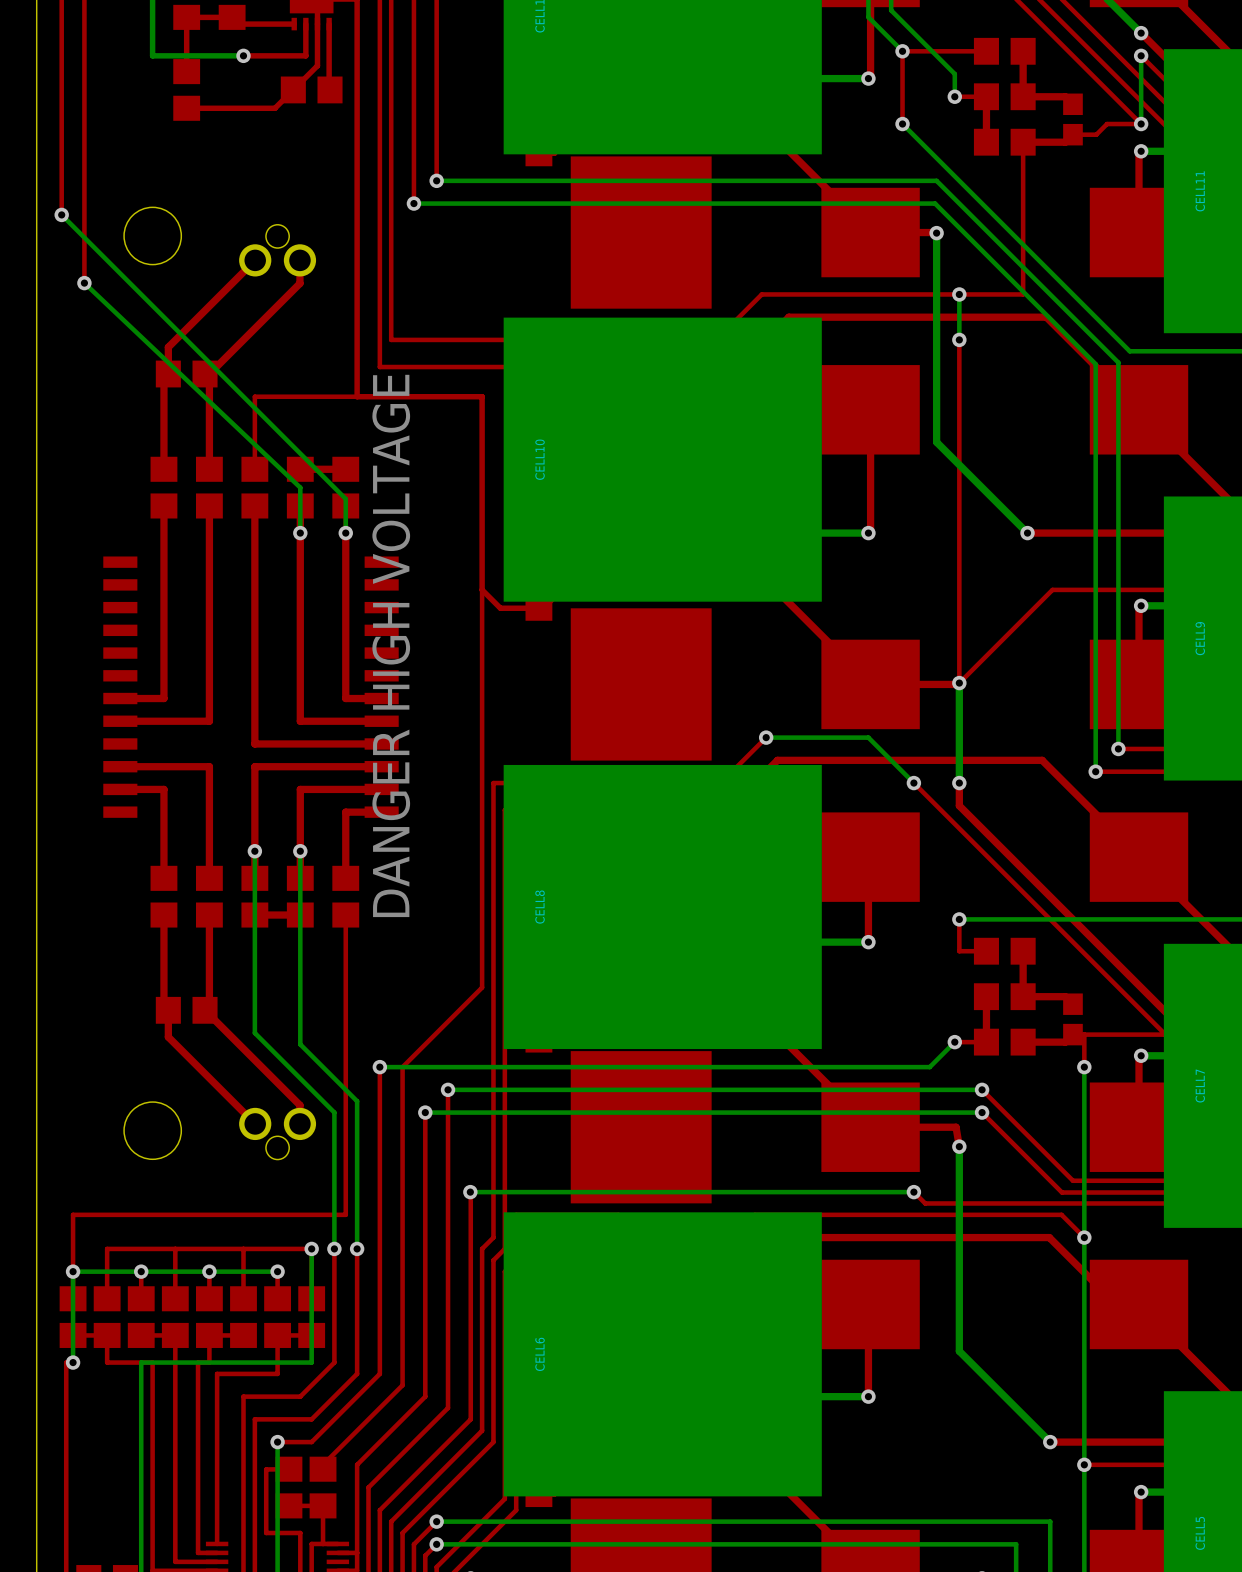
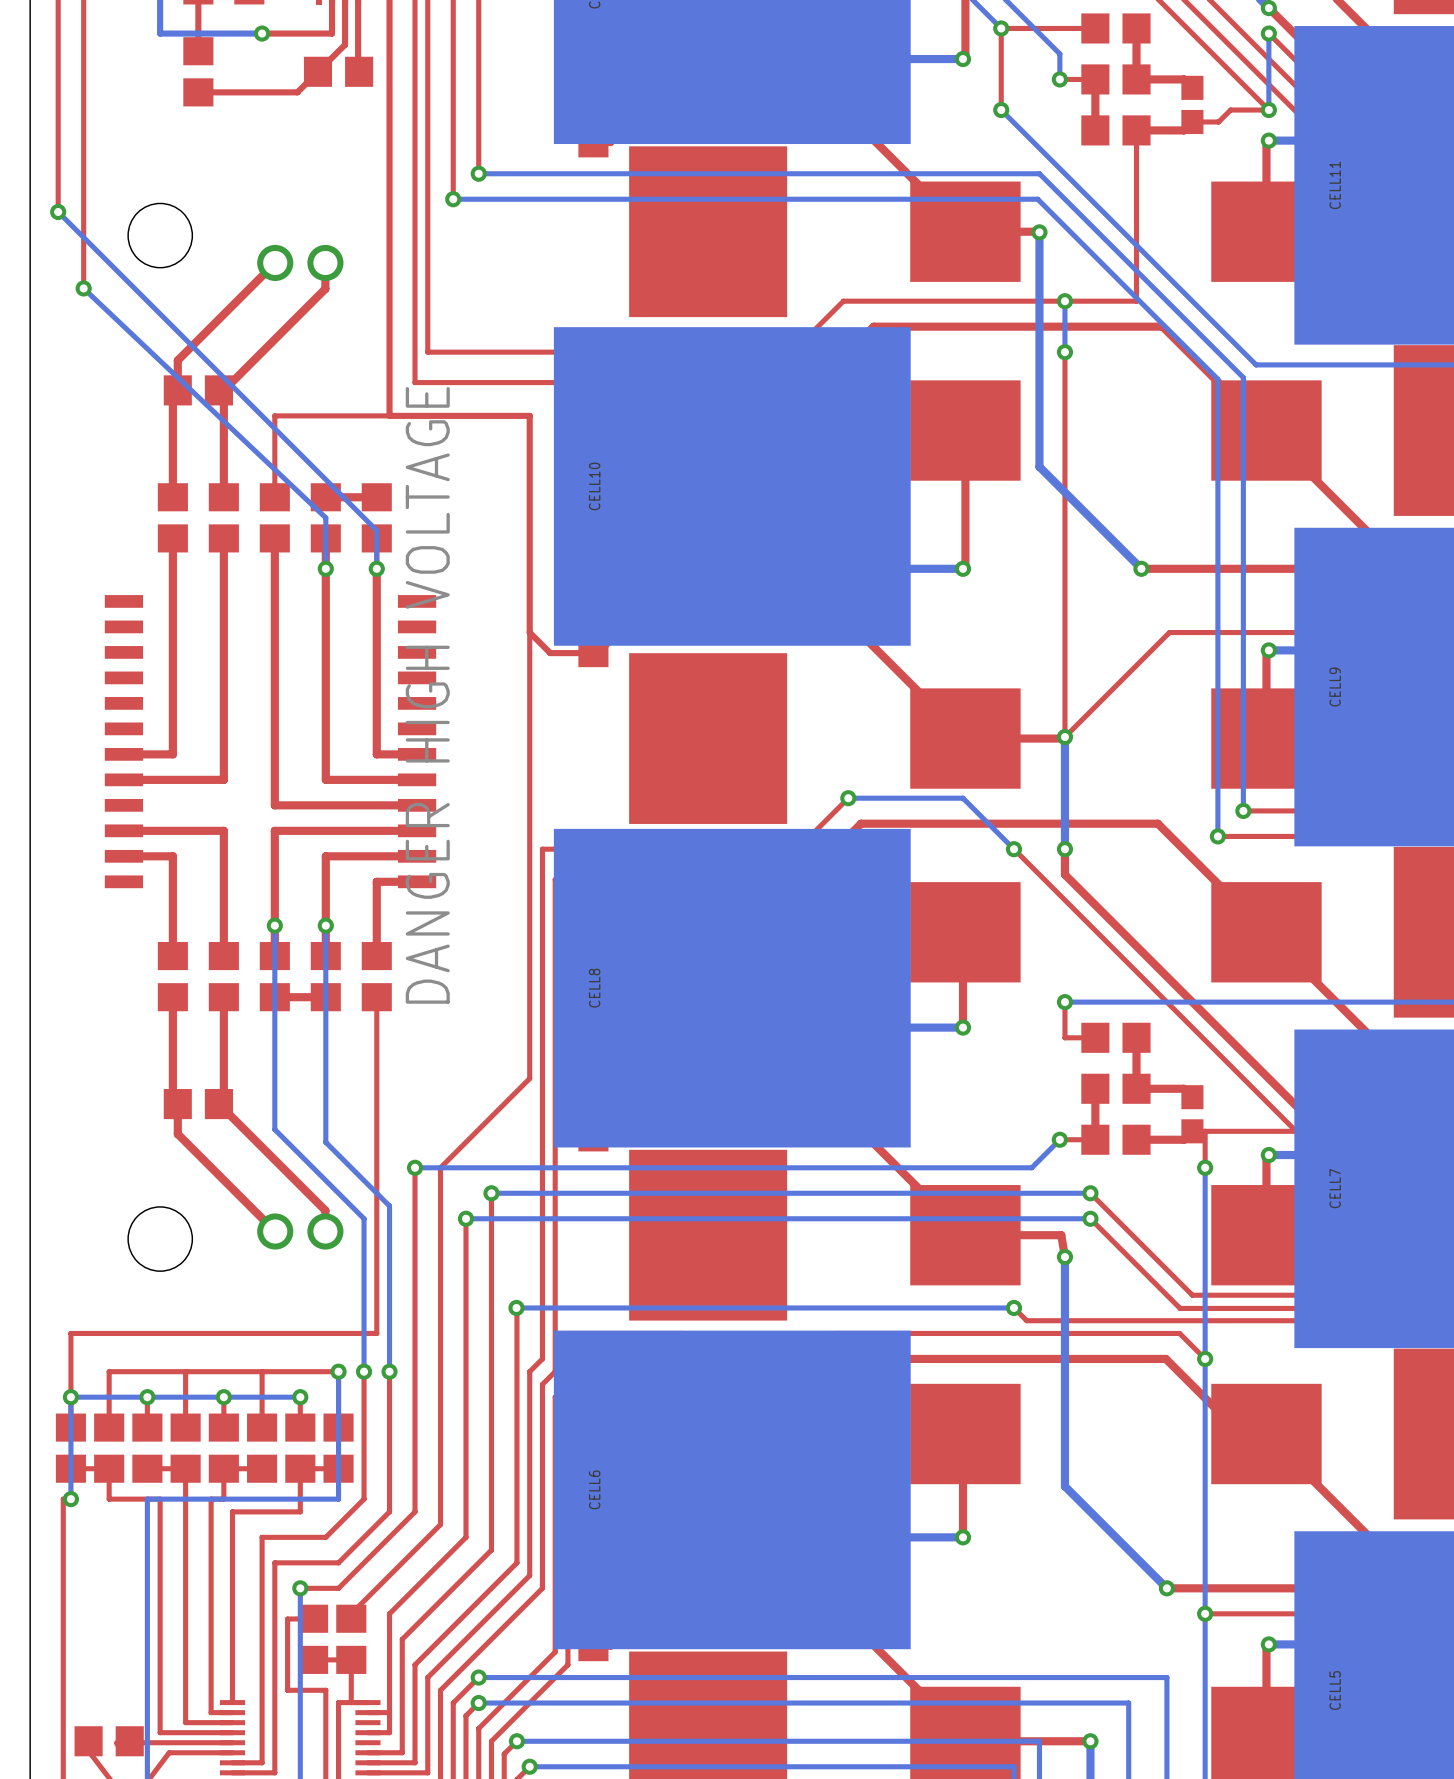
part footprint: [239, 224, 317, 277] -> [257, 244, 344, 282]
part footprint: [239, 1107, 317, 1160] -> [257, 1213, 344, 1250]

